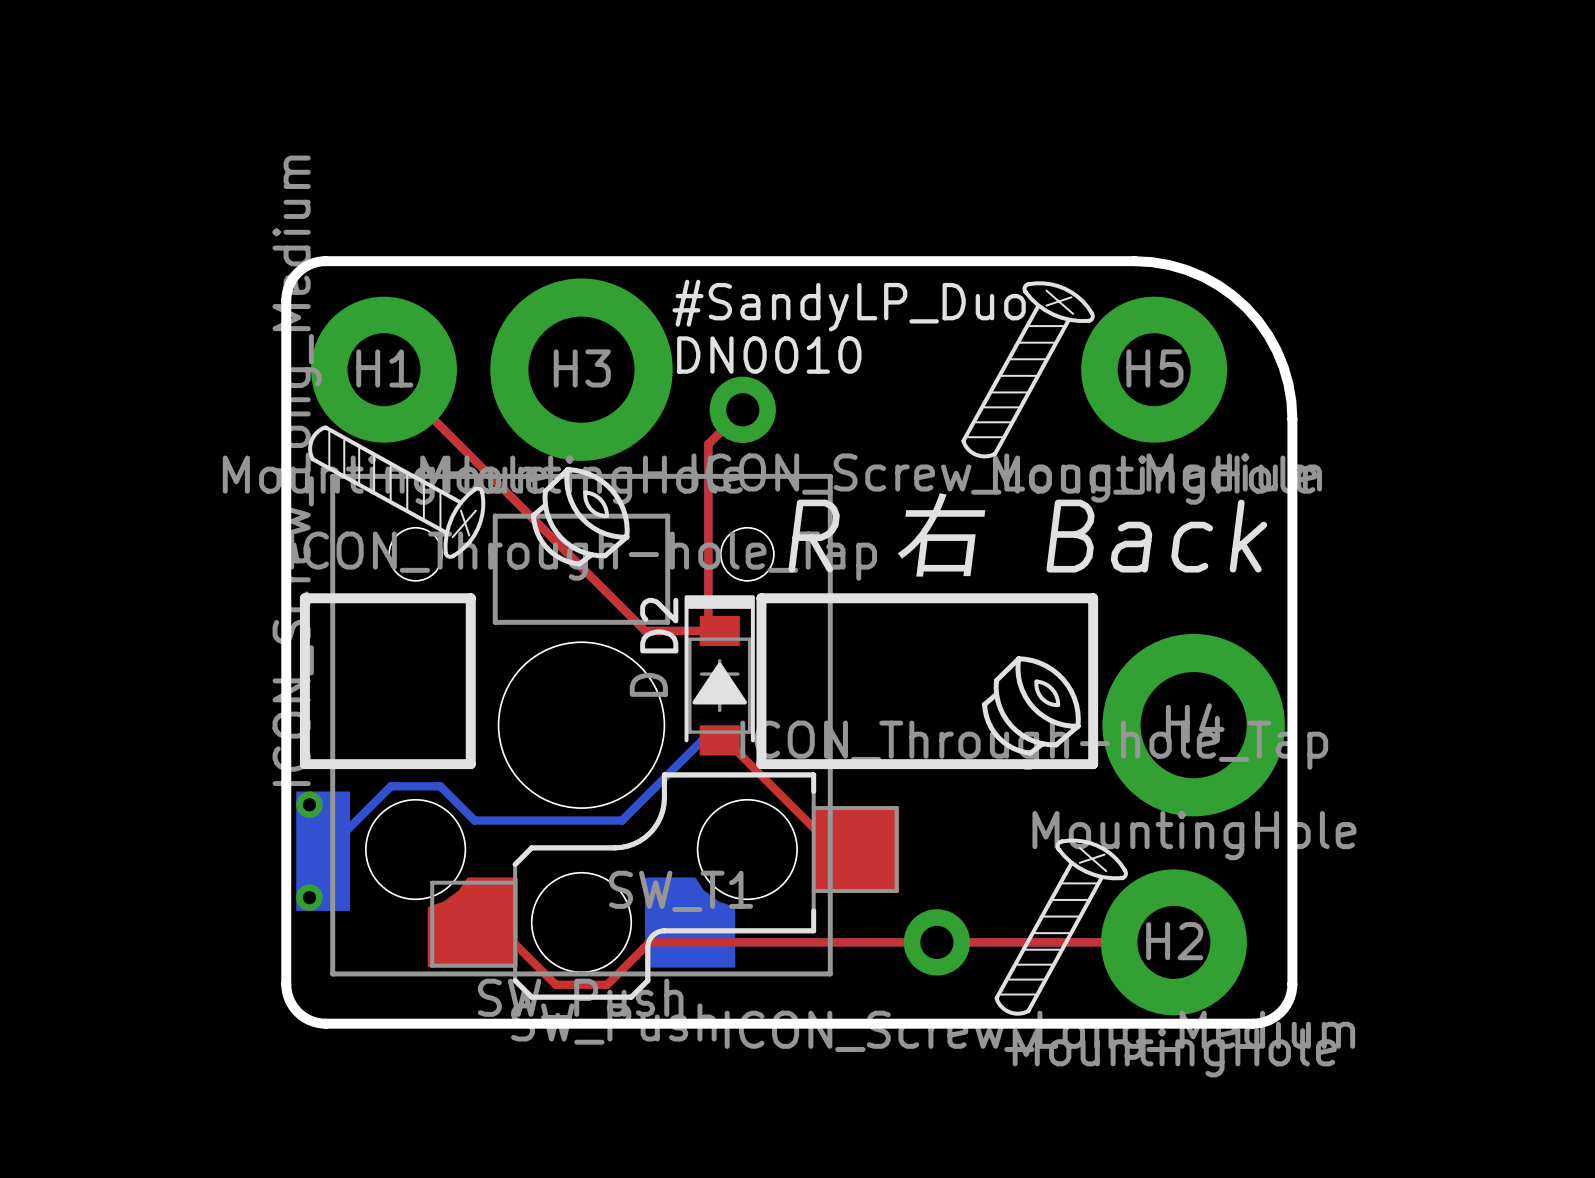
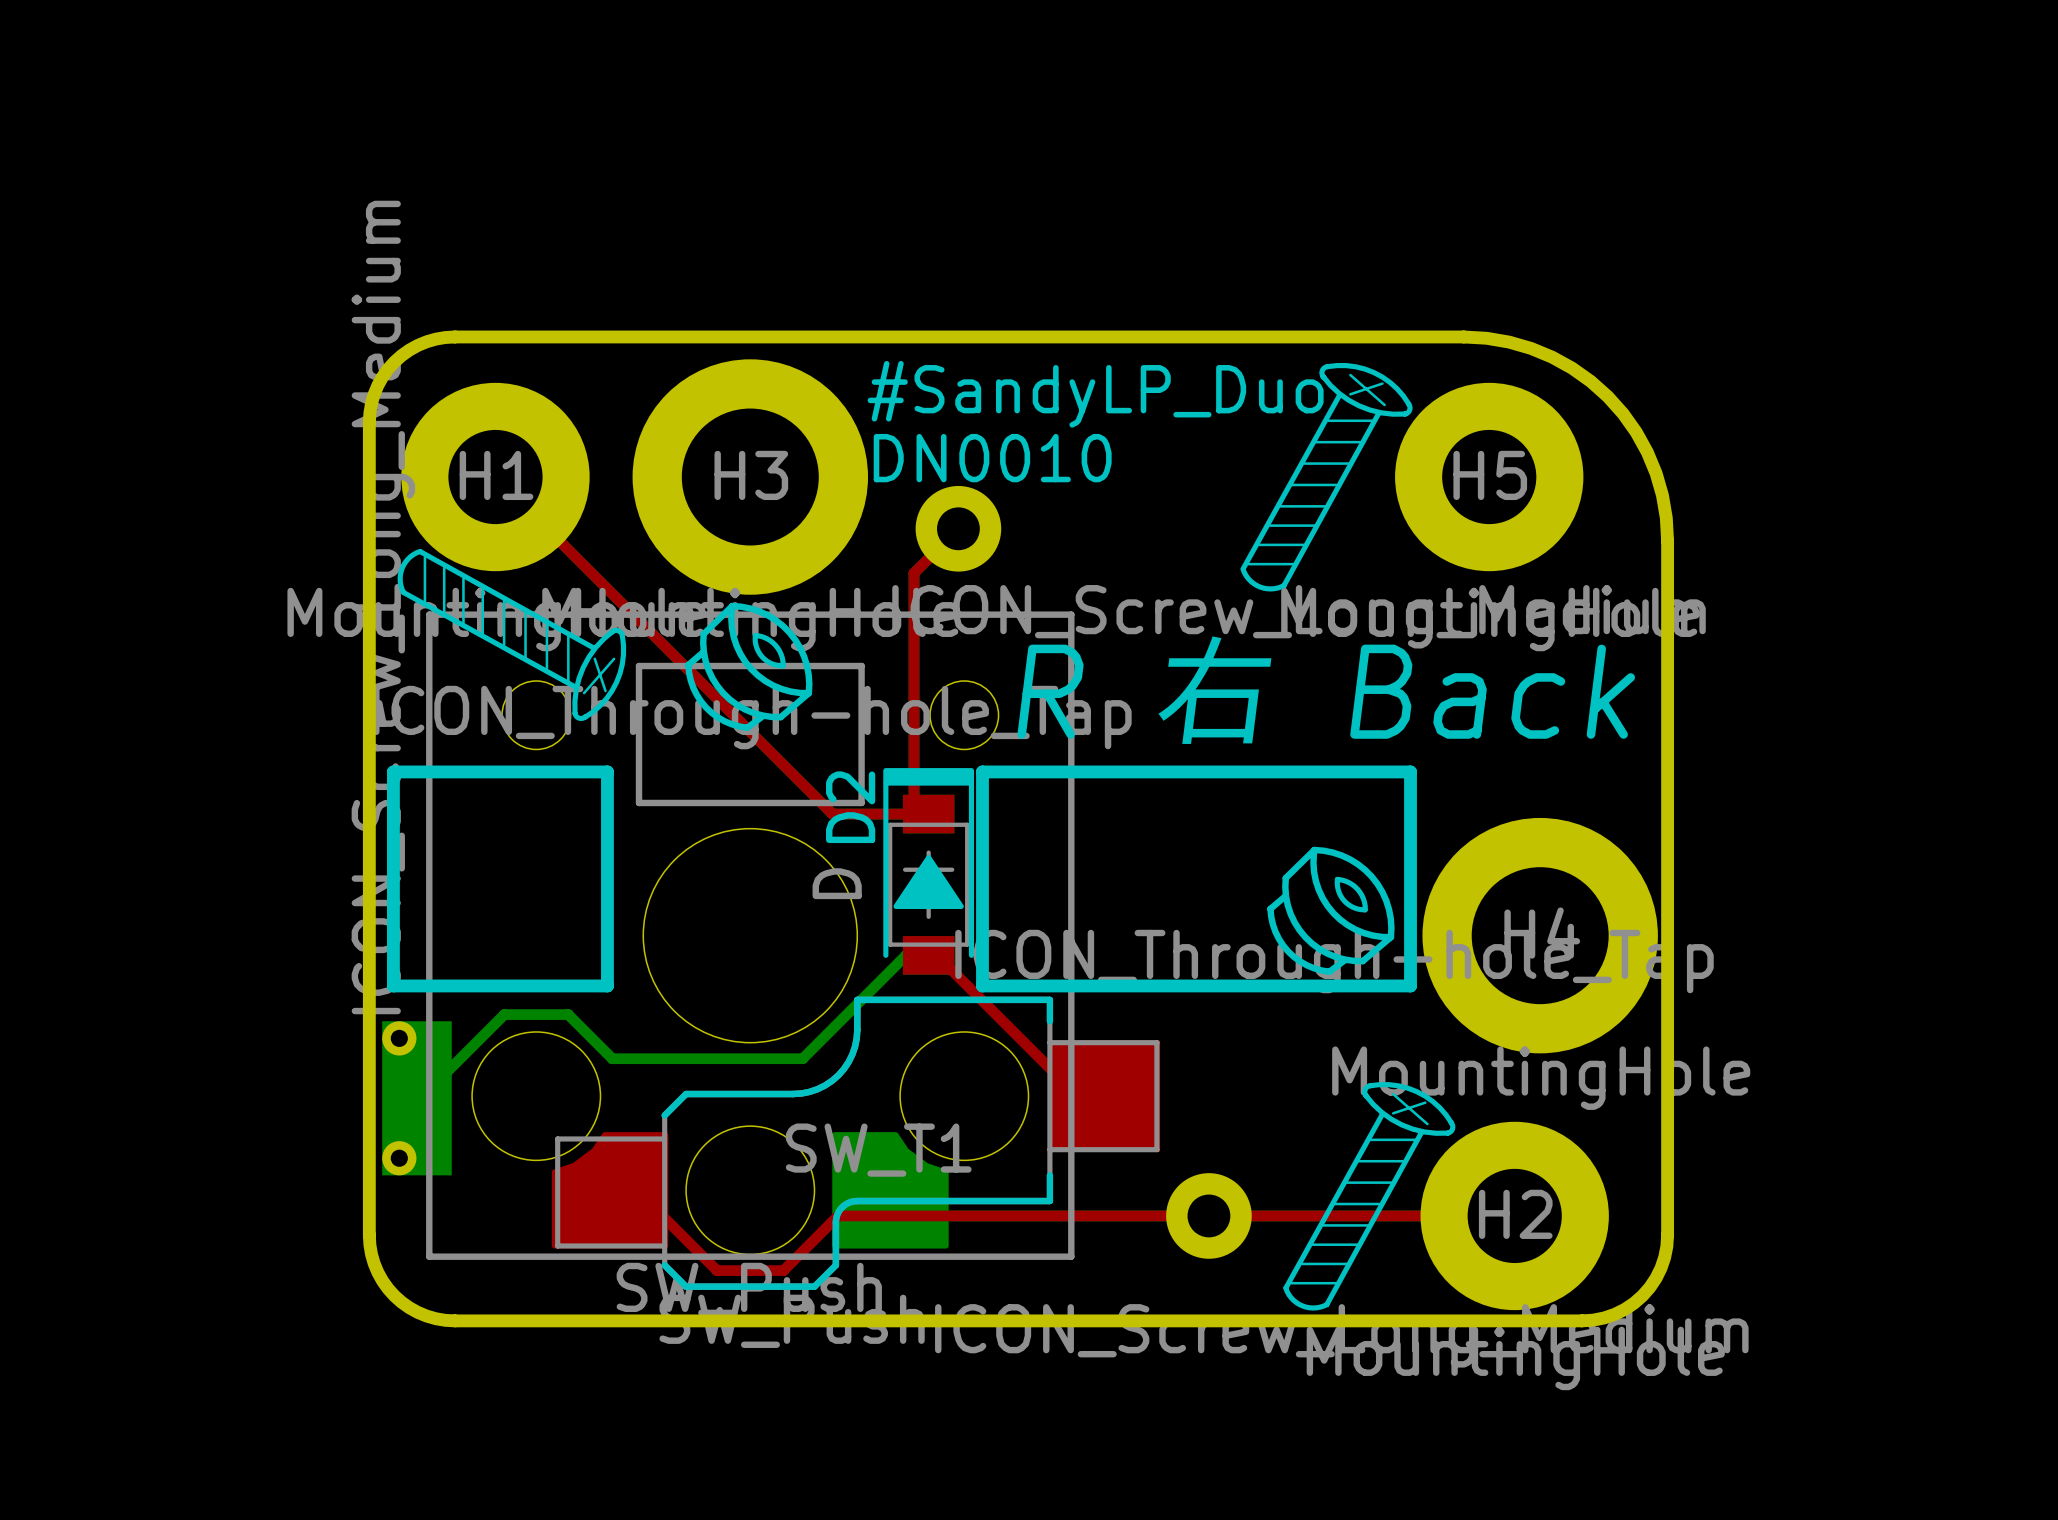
drawing shape: [281, 256, 1298, 1029] -> [362, 330, 1675, 1328]

